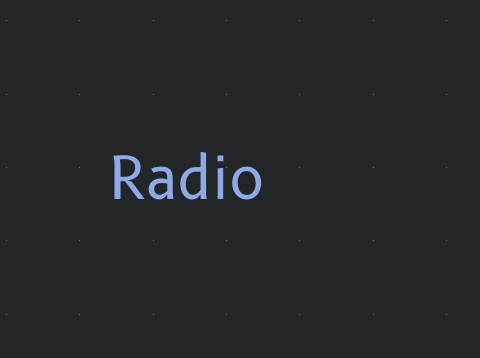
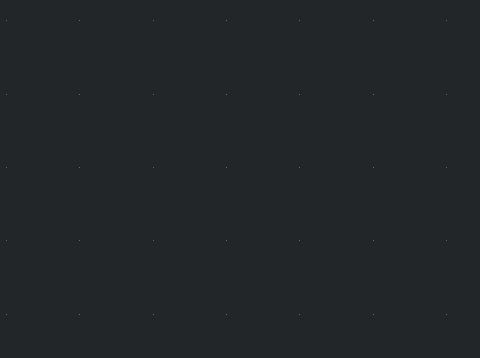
text: Radio (187, 175) -> none

